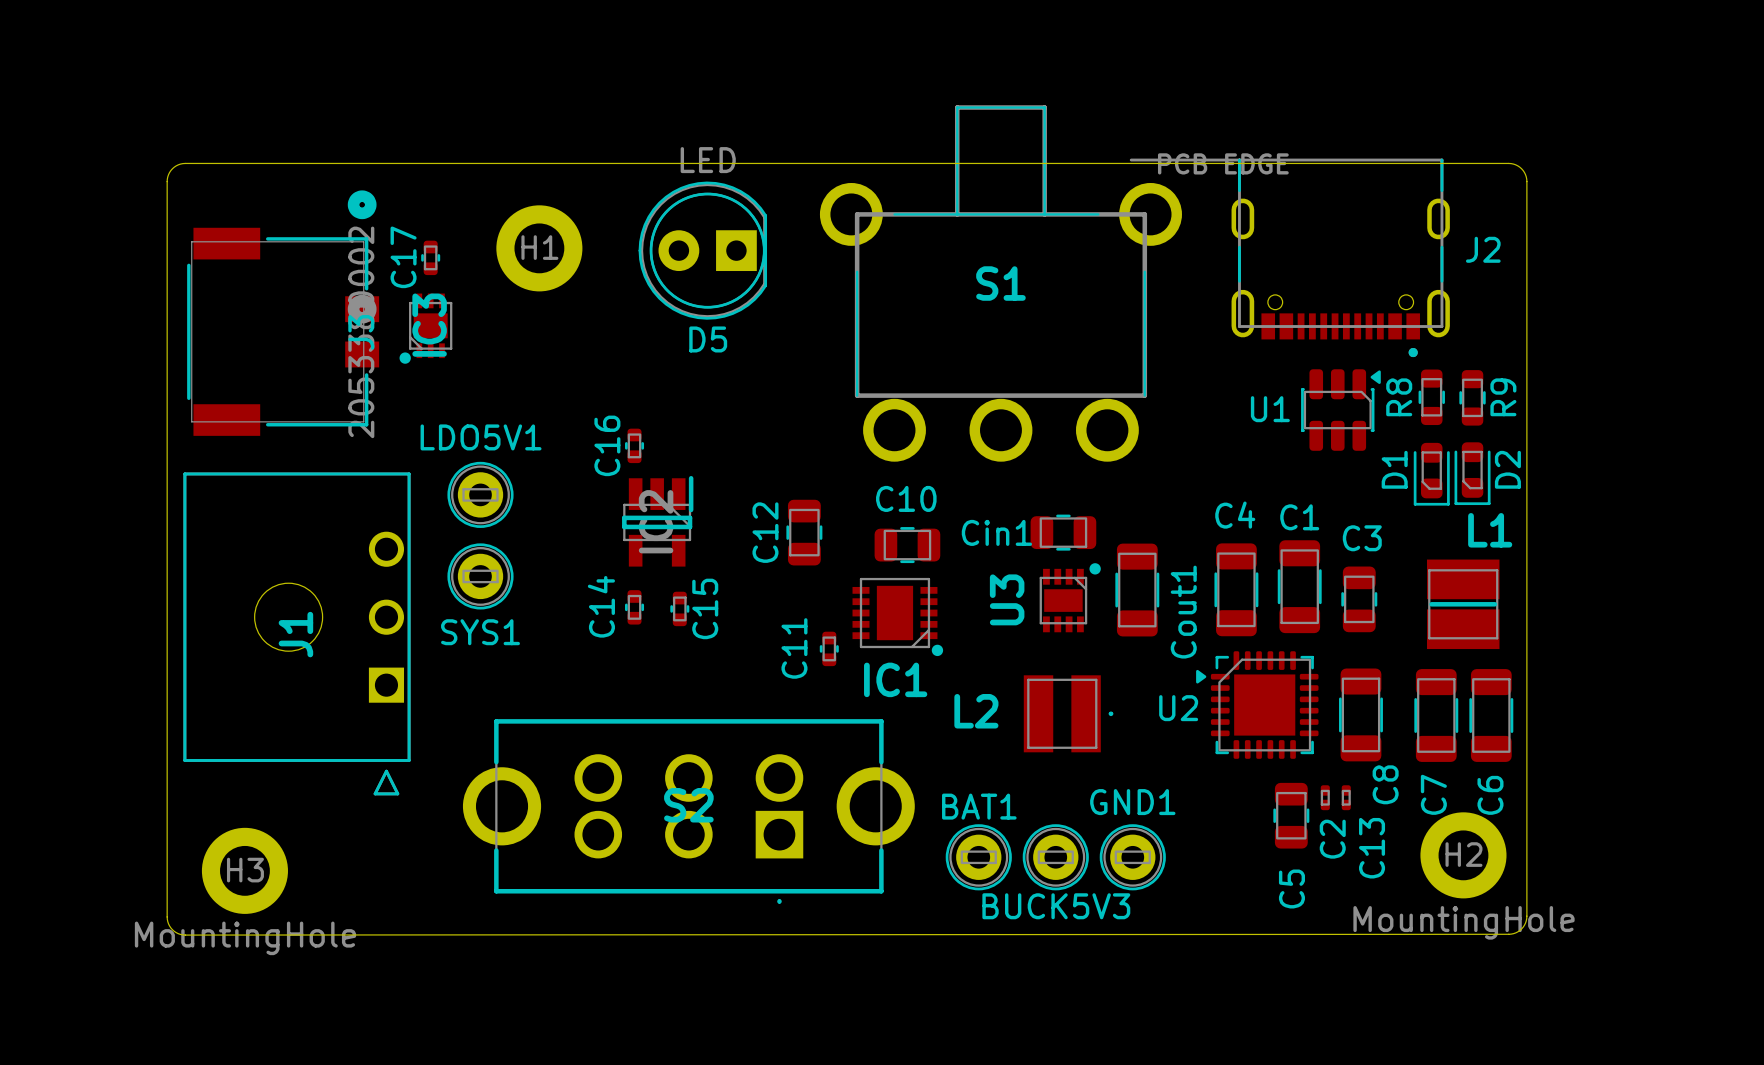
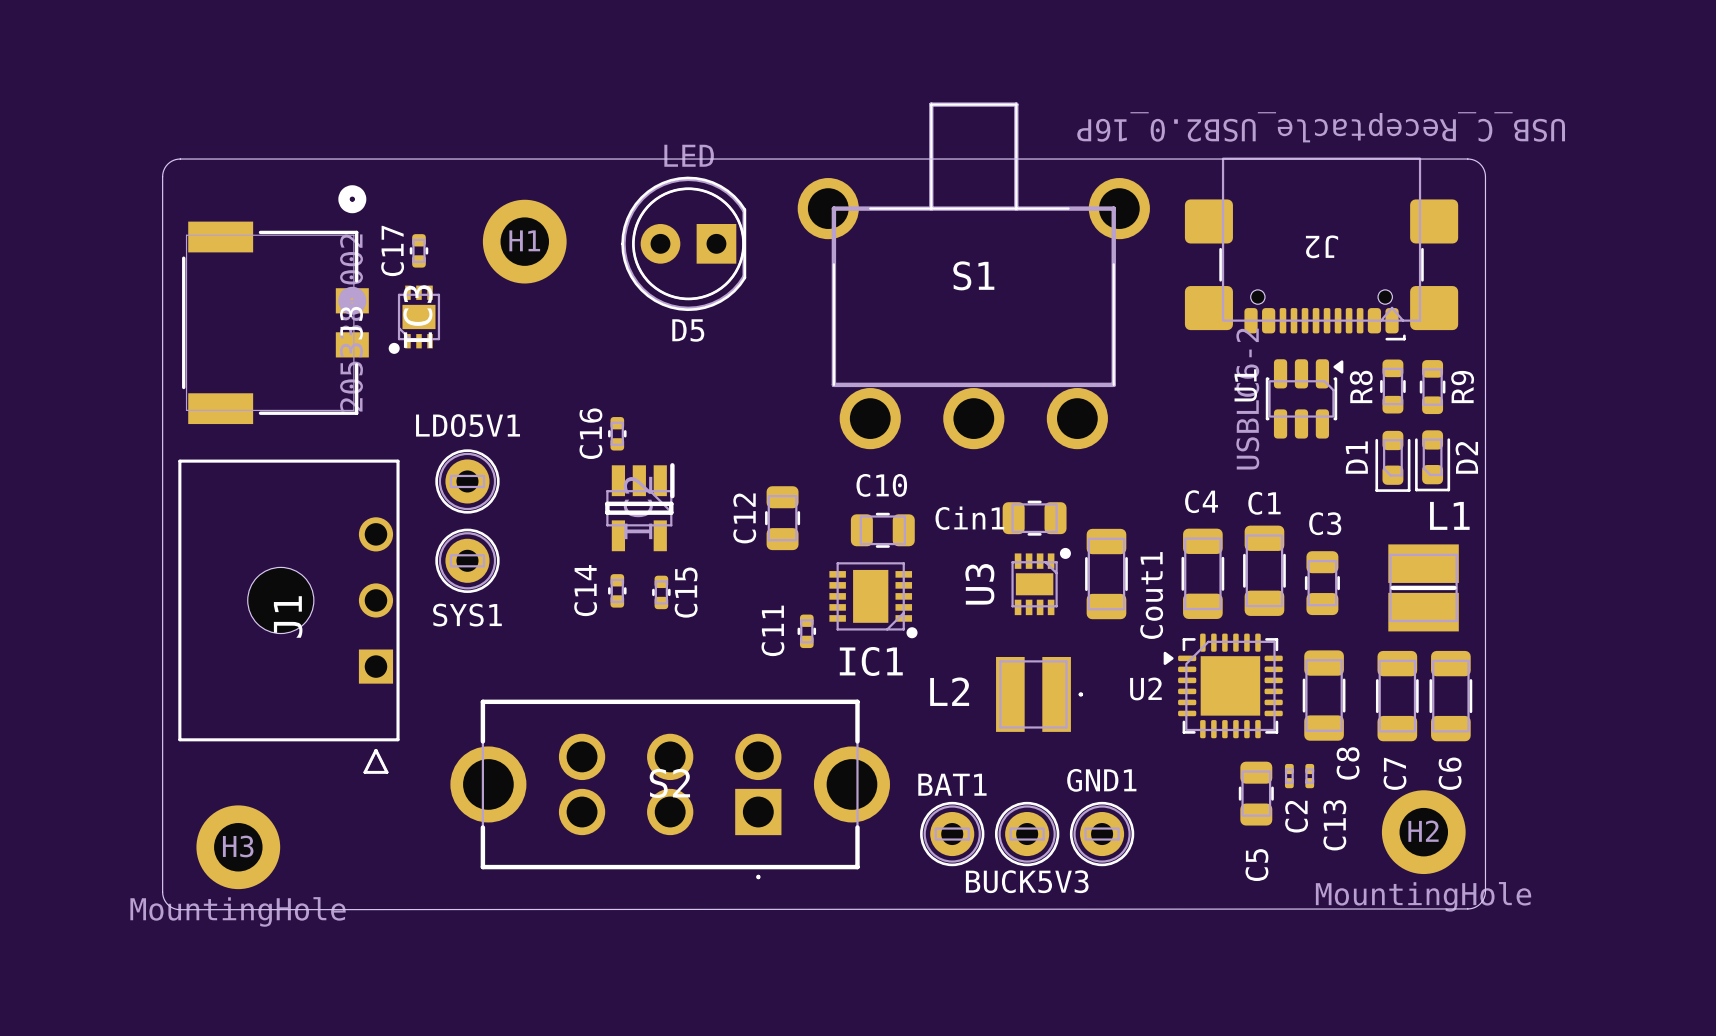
J2 value: none -> USB_C_Receptacle_USB2.0_16P (1321, 127)
J2 footprint: [1129, 158, 1450, 358] -> [1184, 157, 1459, 341]
J2 name position: J2 (1483, 249) -> J2 (1322, 246)
U1 name rotation: 0° (1270, 409) -> 90° counterclockwise (1245, 385)
U1 value: none -> USBLC6-2 (1247, 399)

